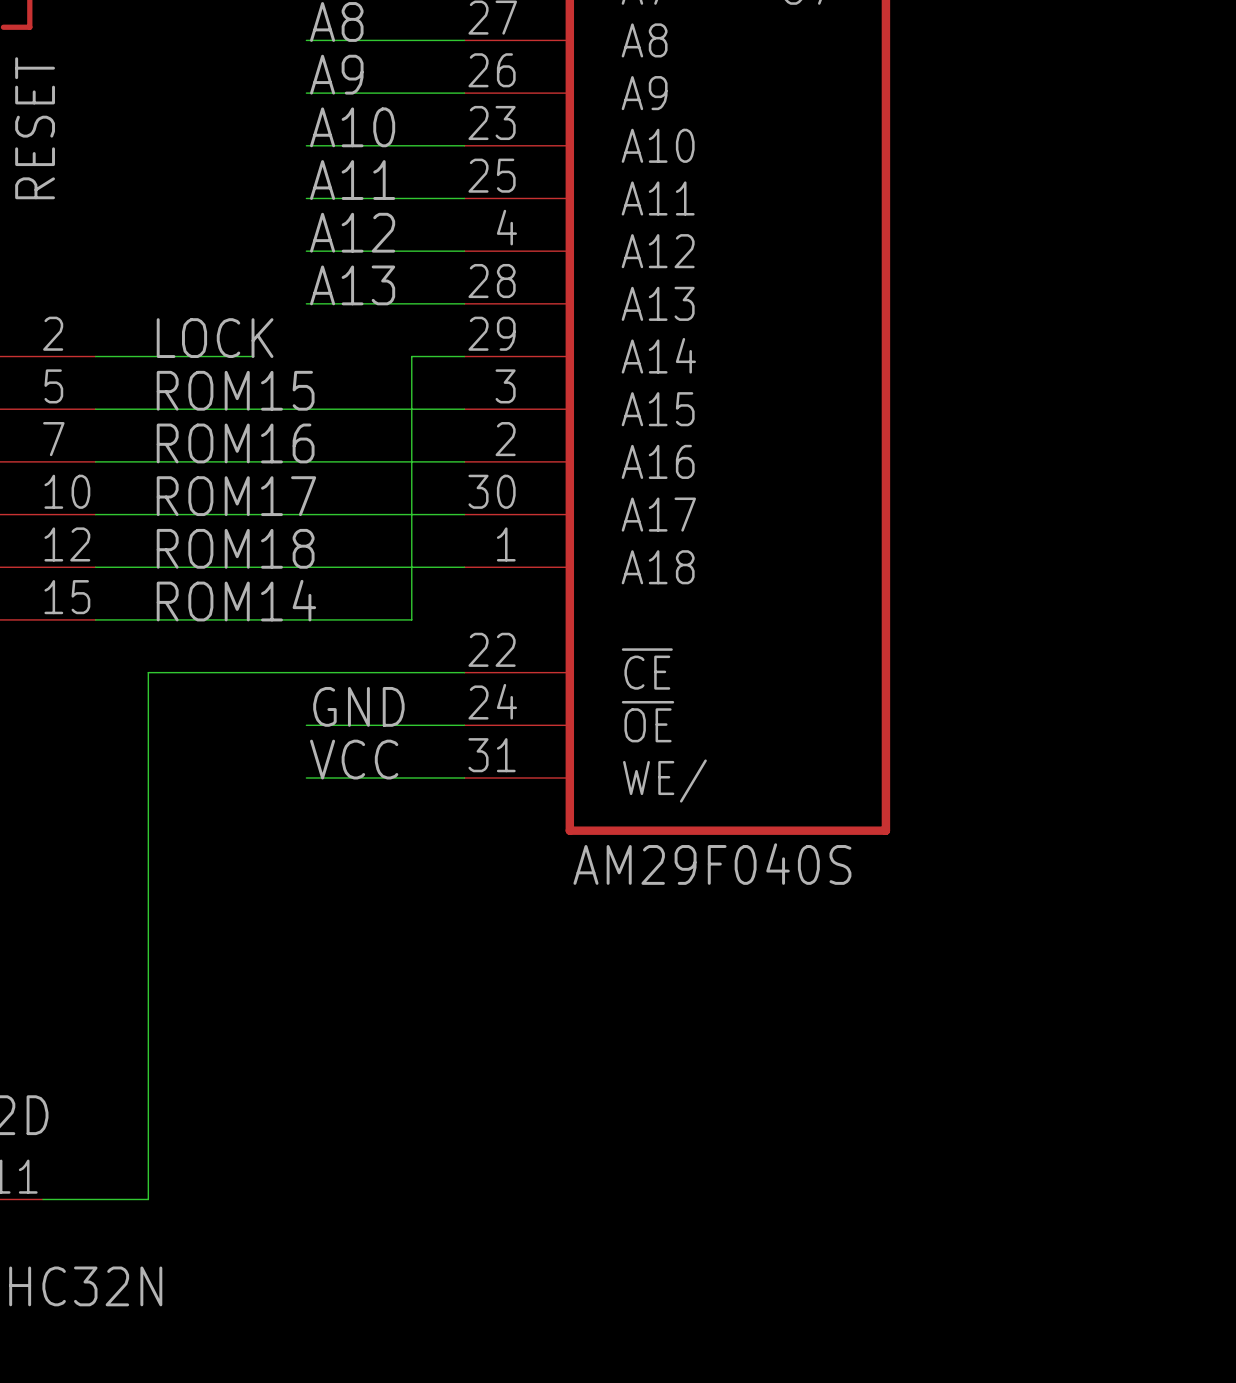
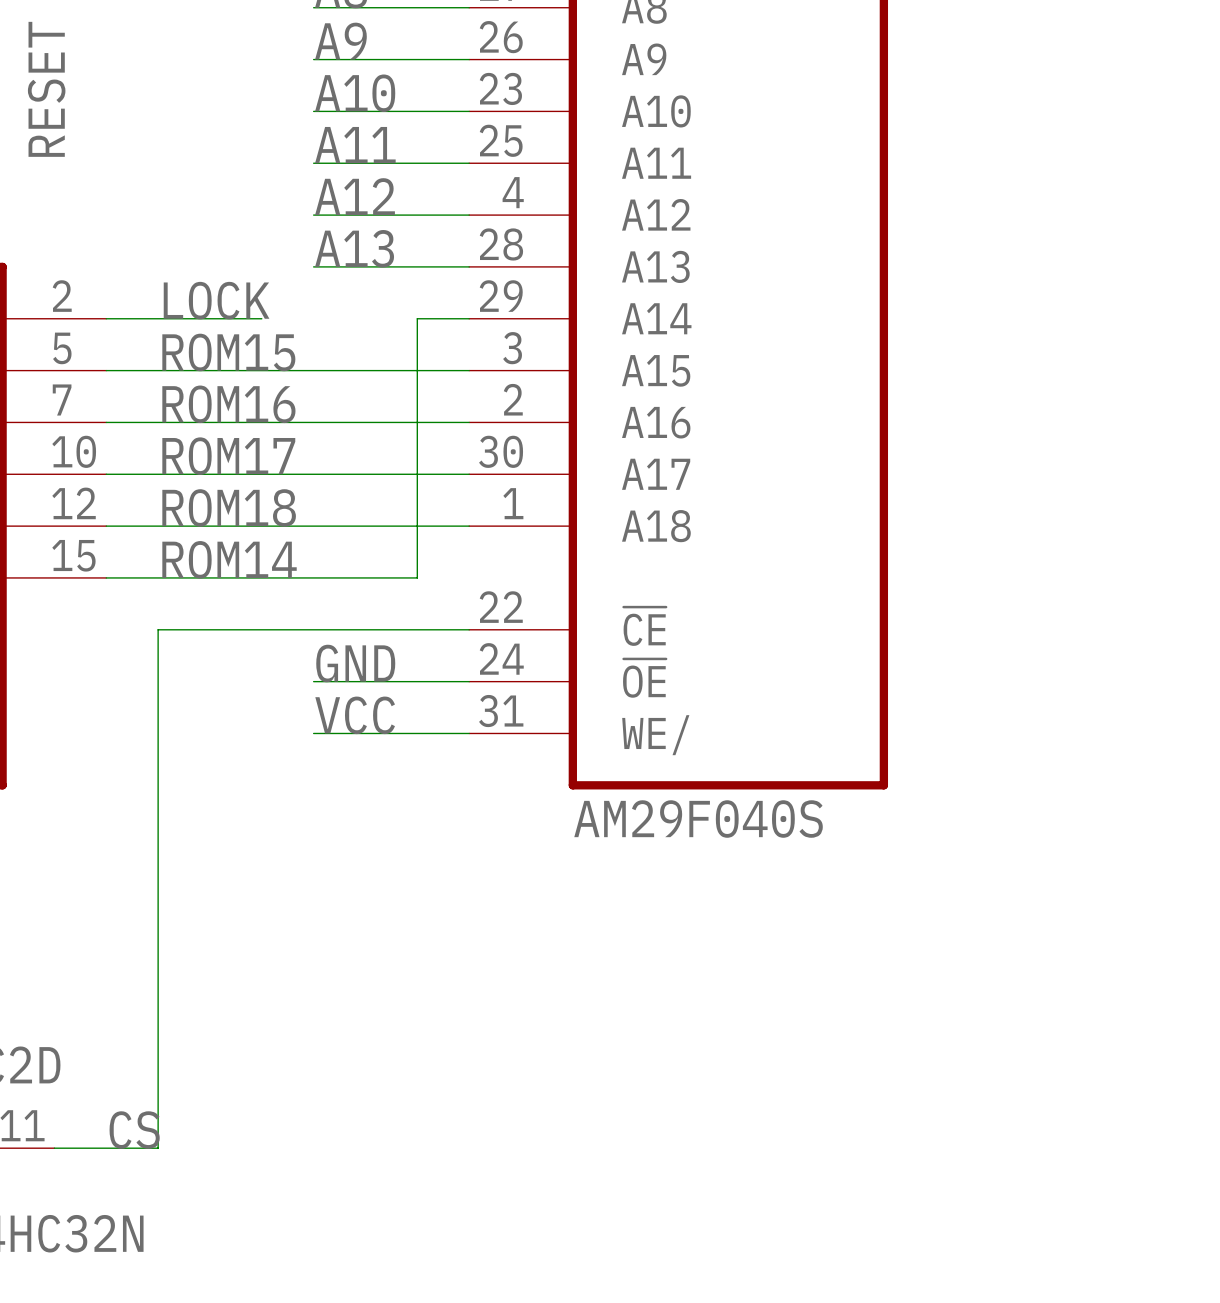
label: none -> CS (134, 1130)

